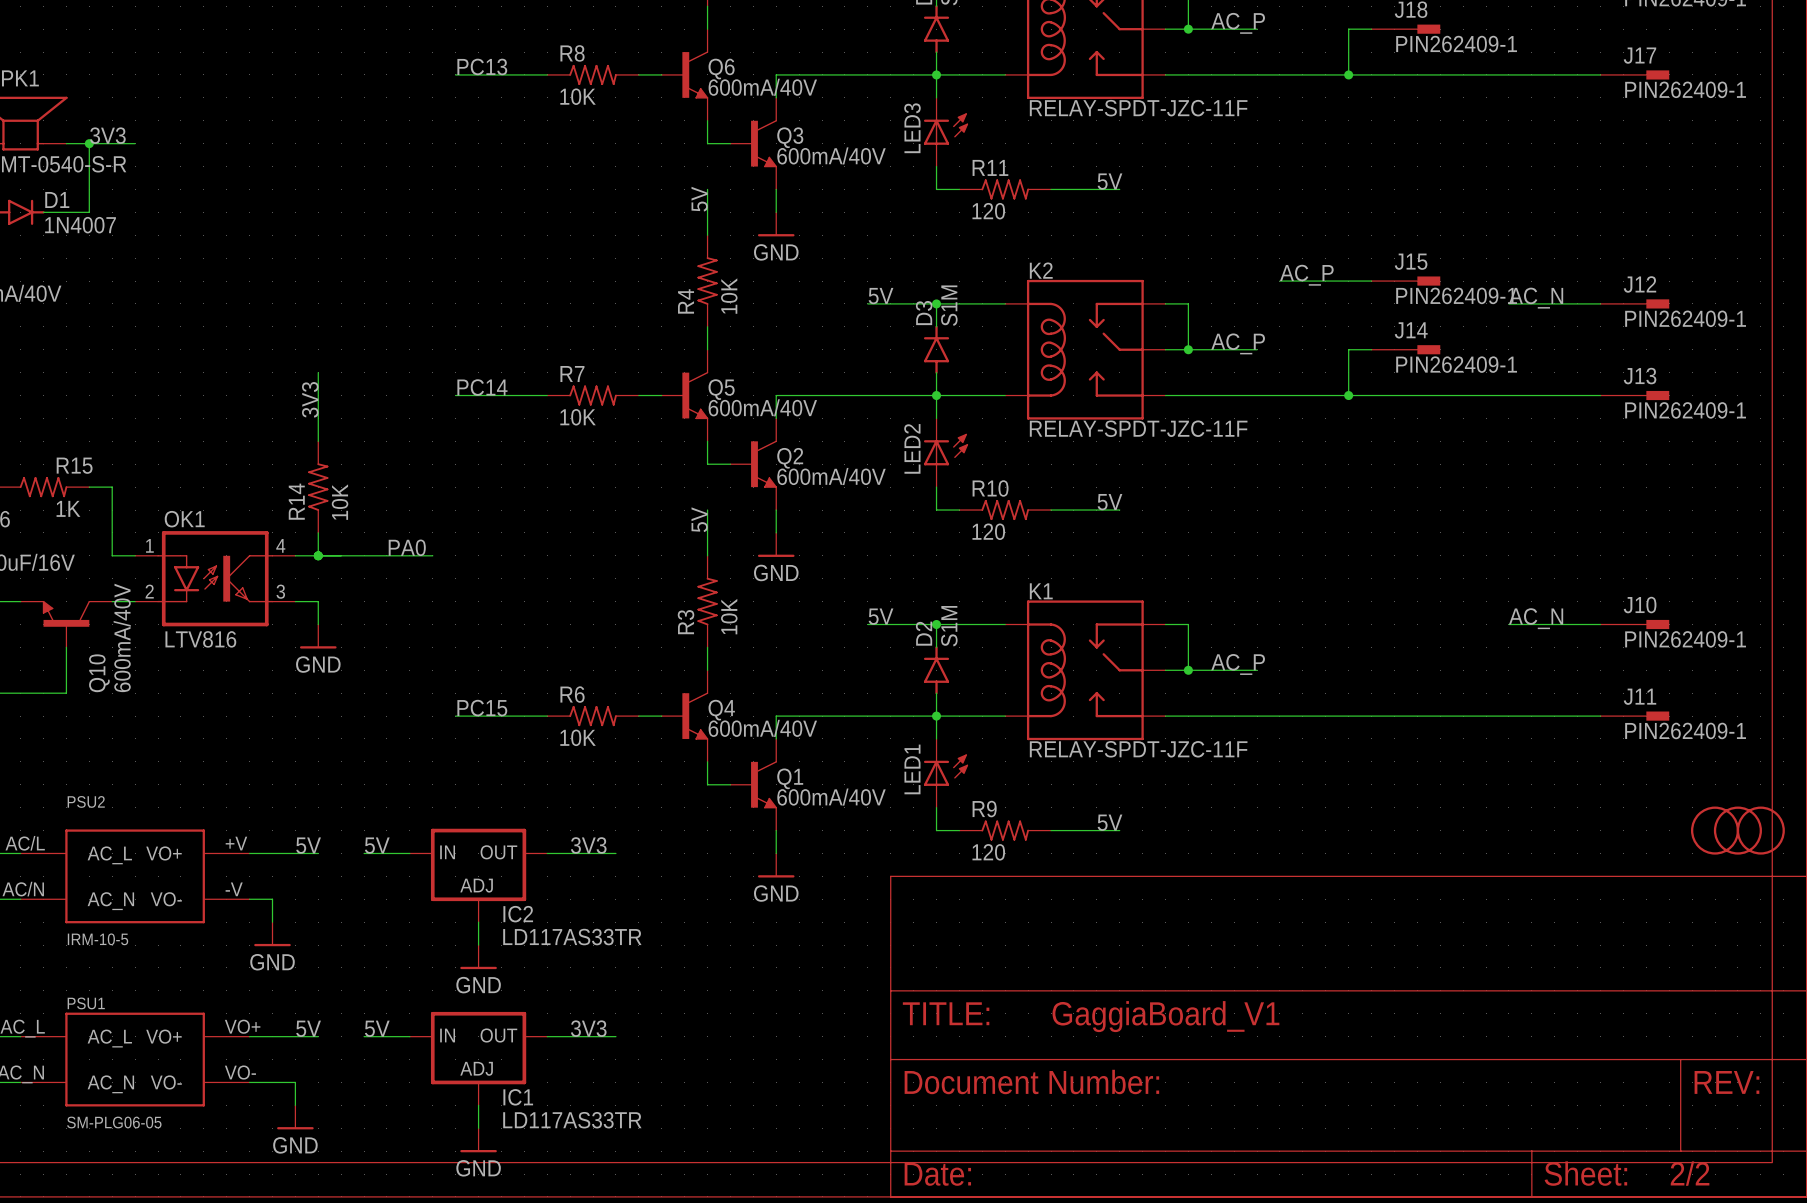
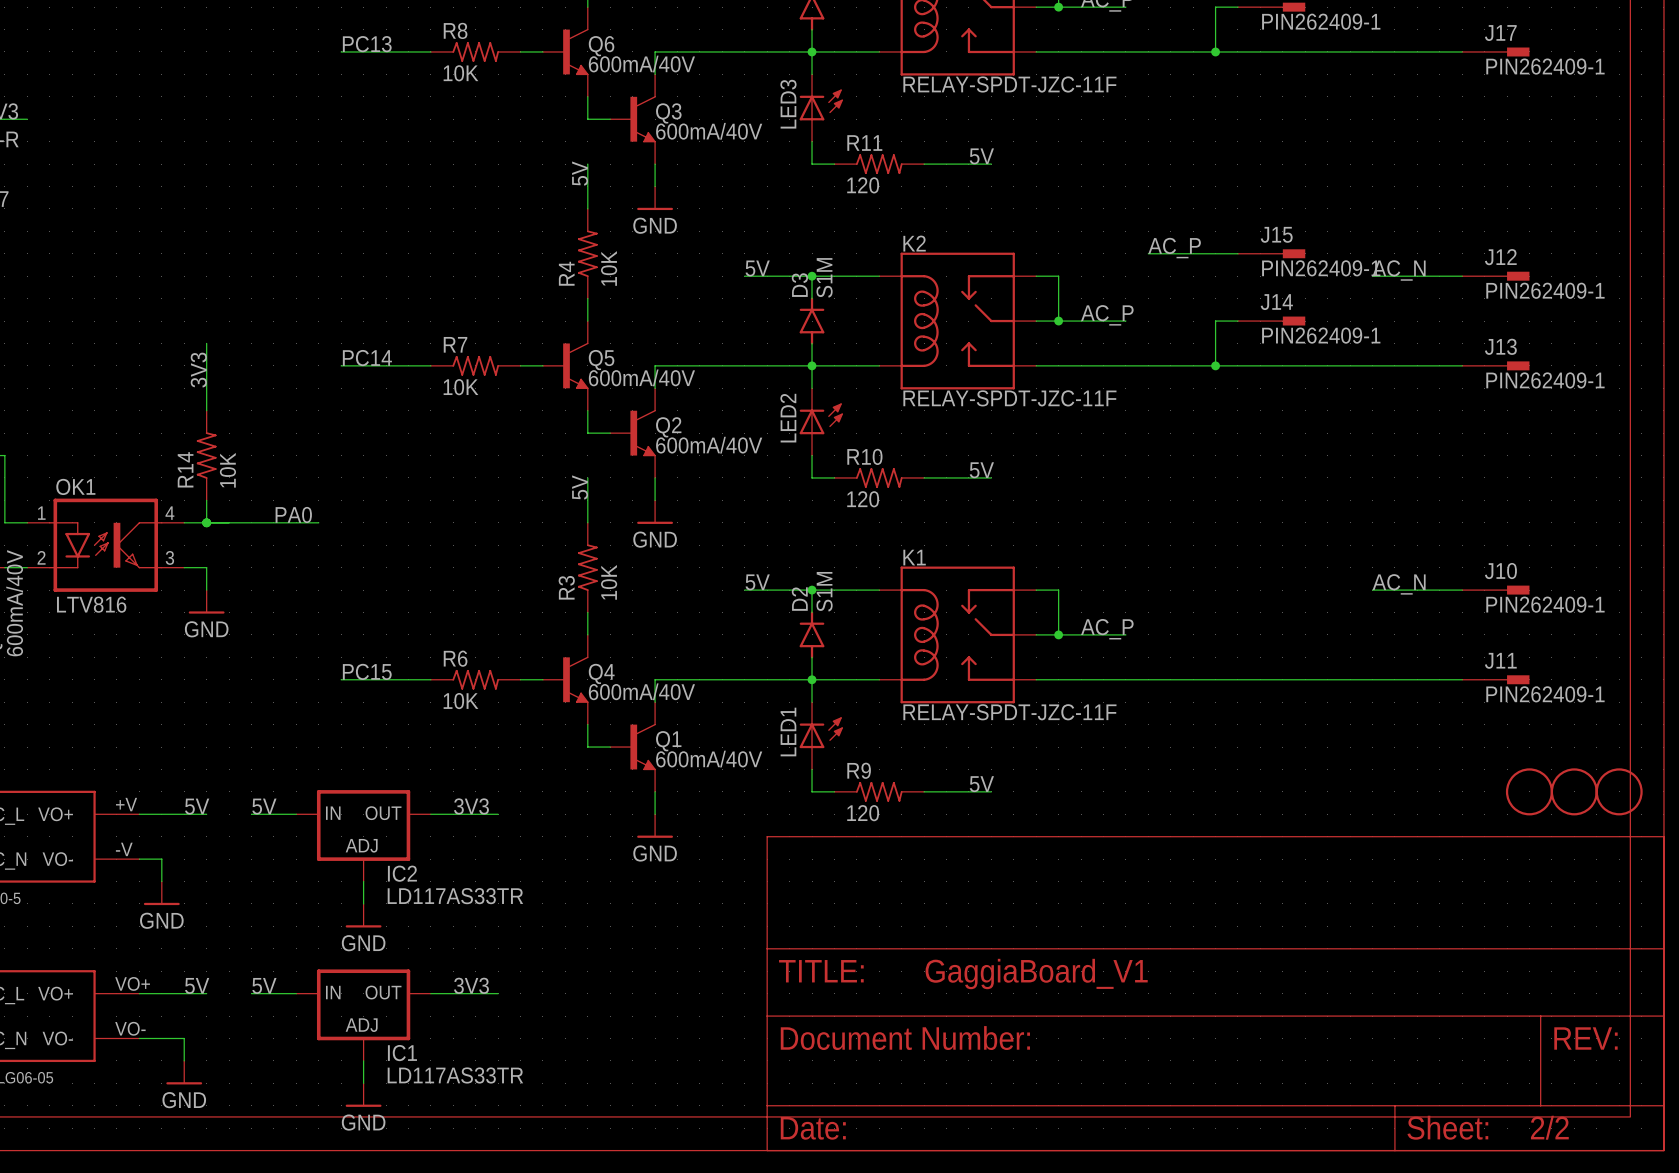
part position: (1737, 830) -> (1529, 791)

